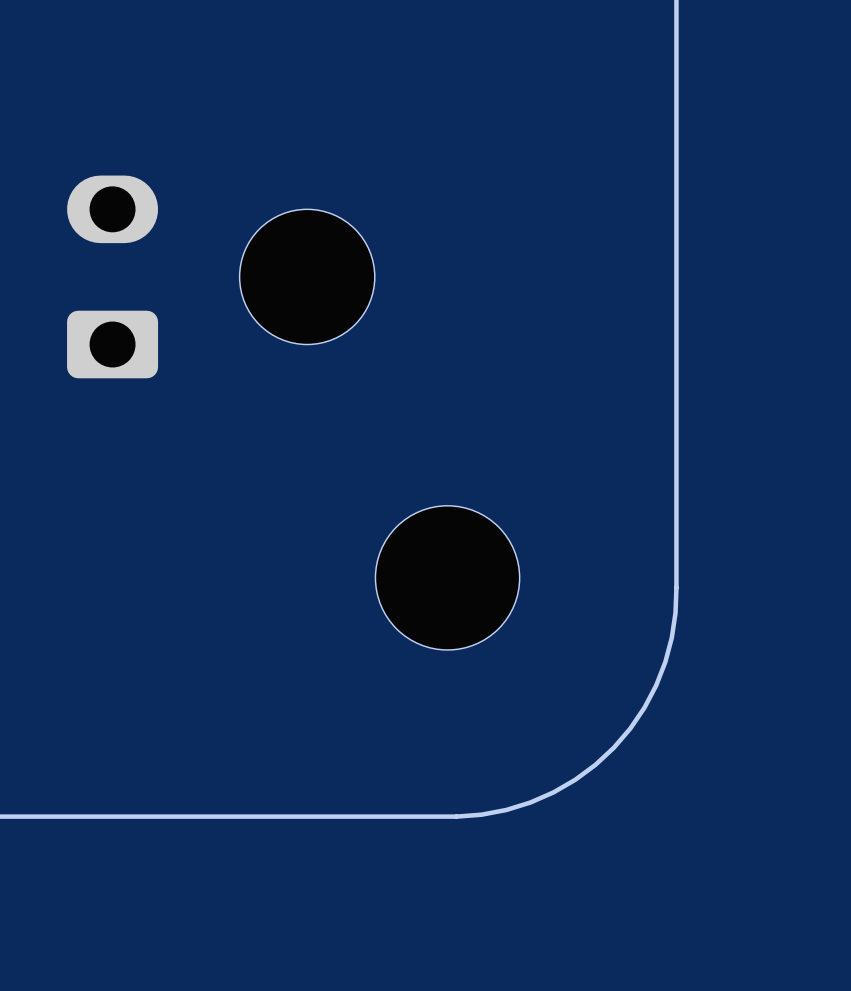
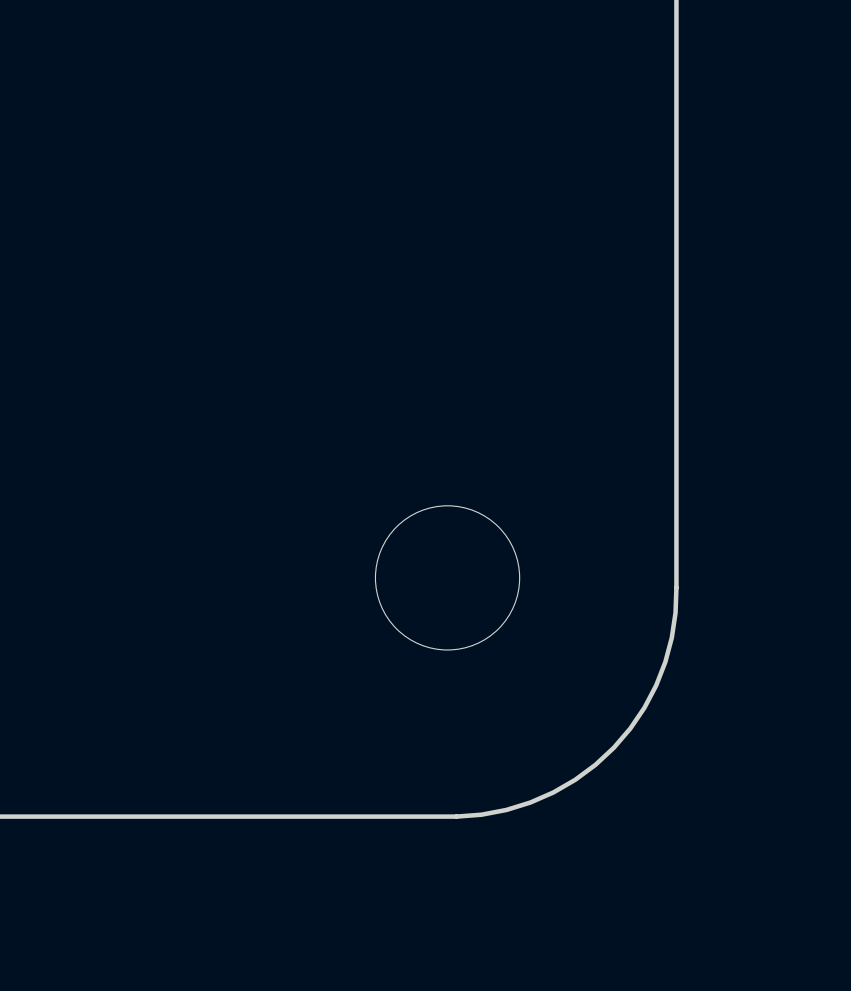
part: (220, 276) -> none

